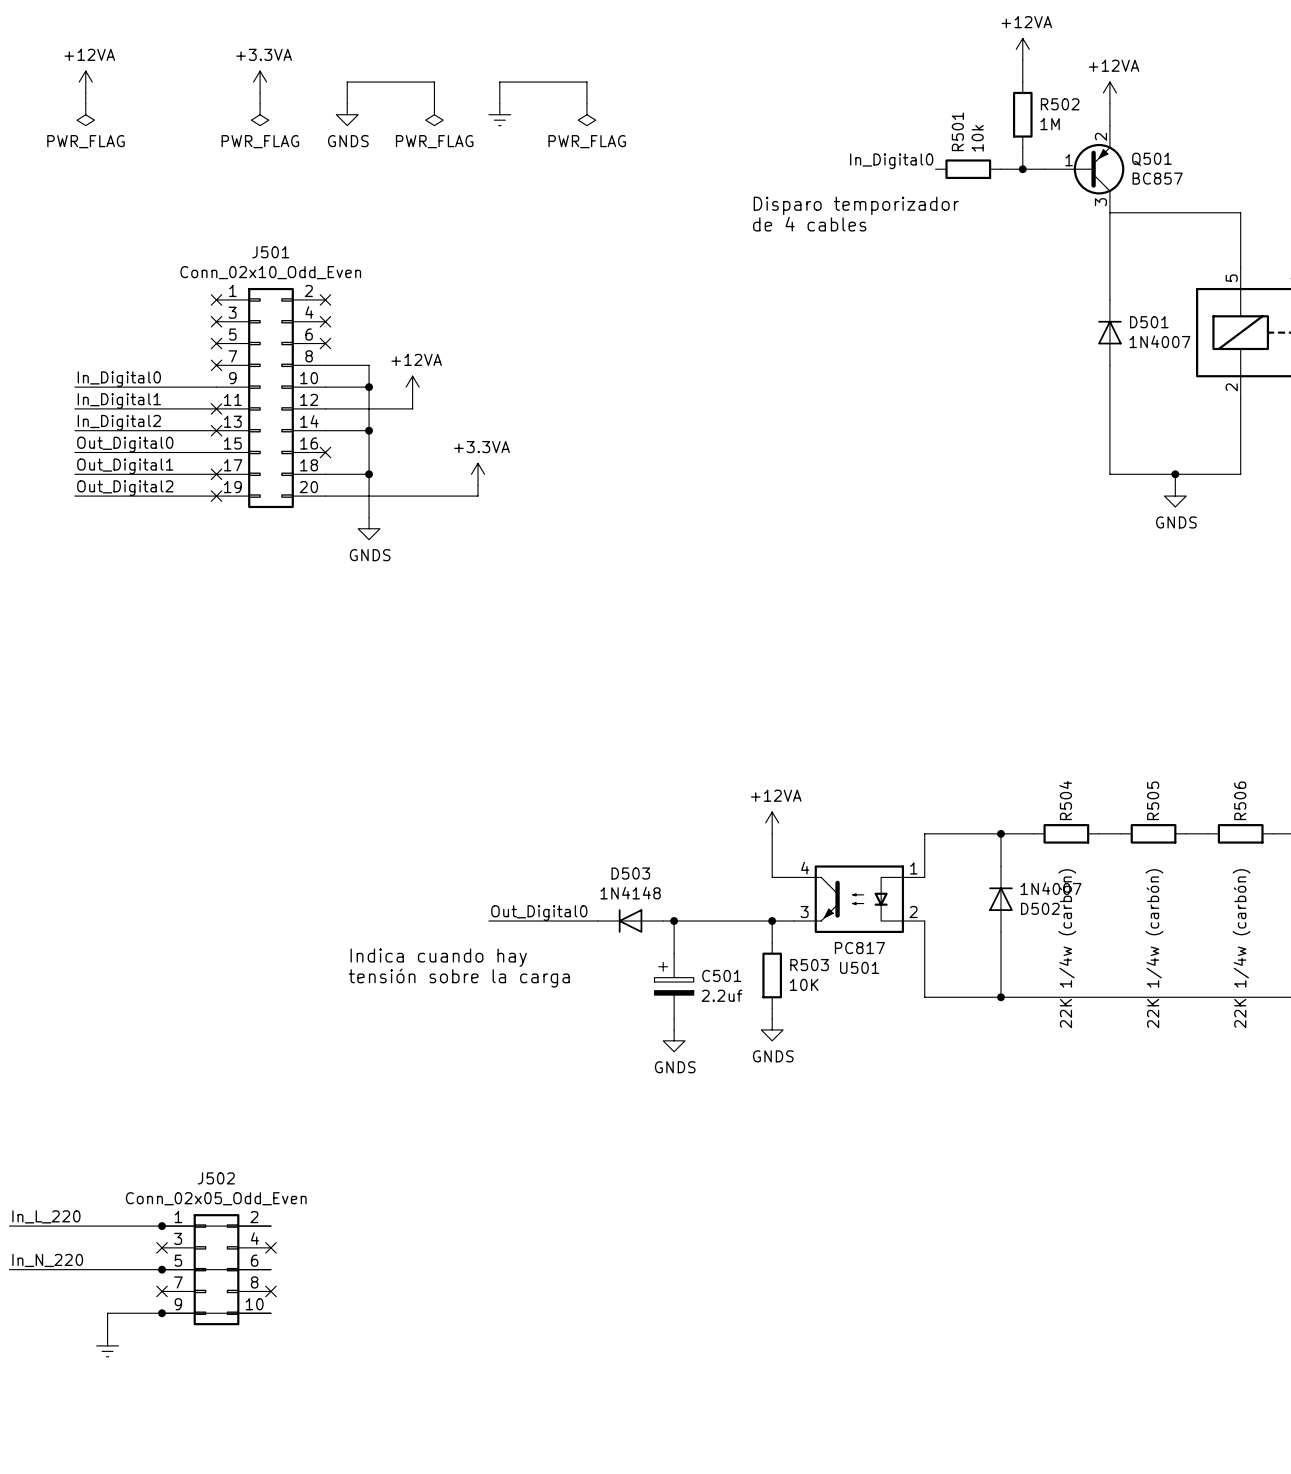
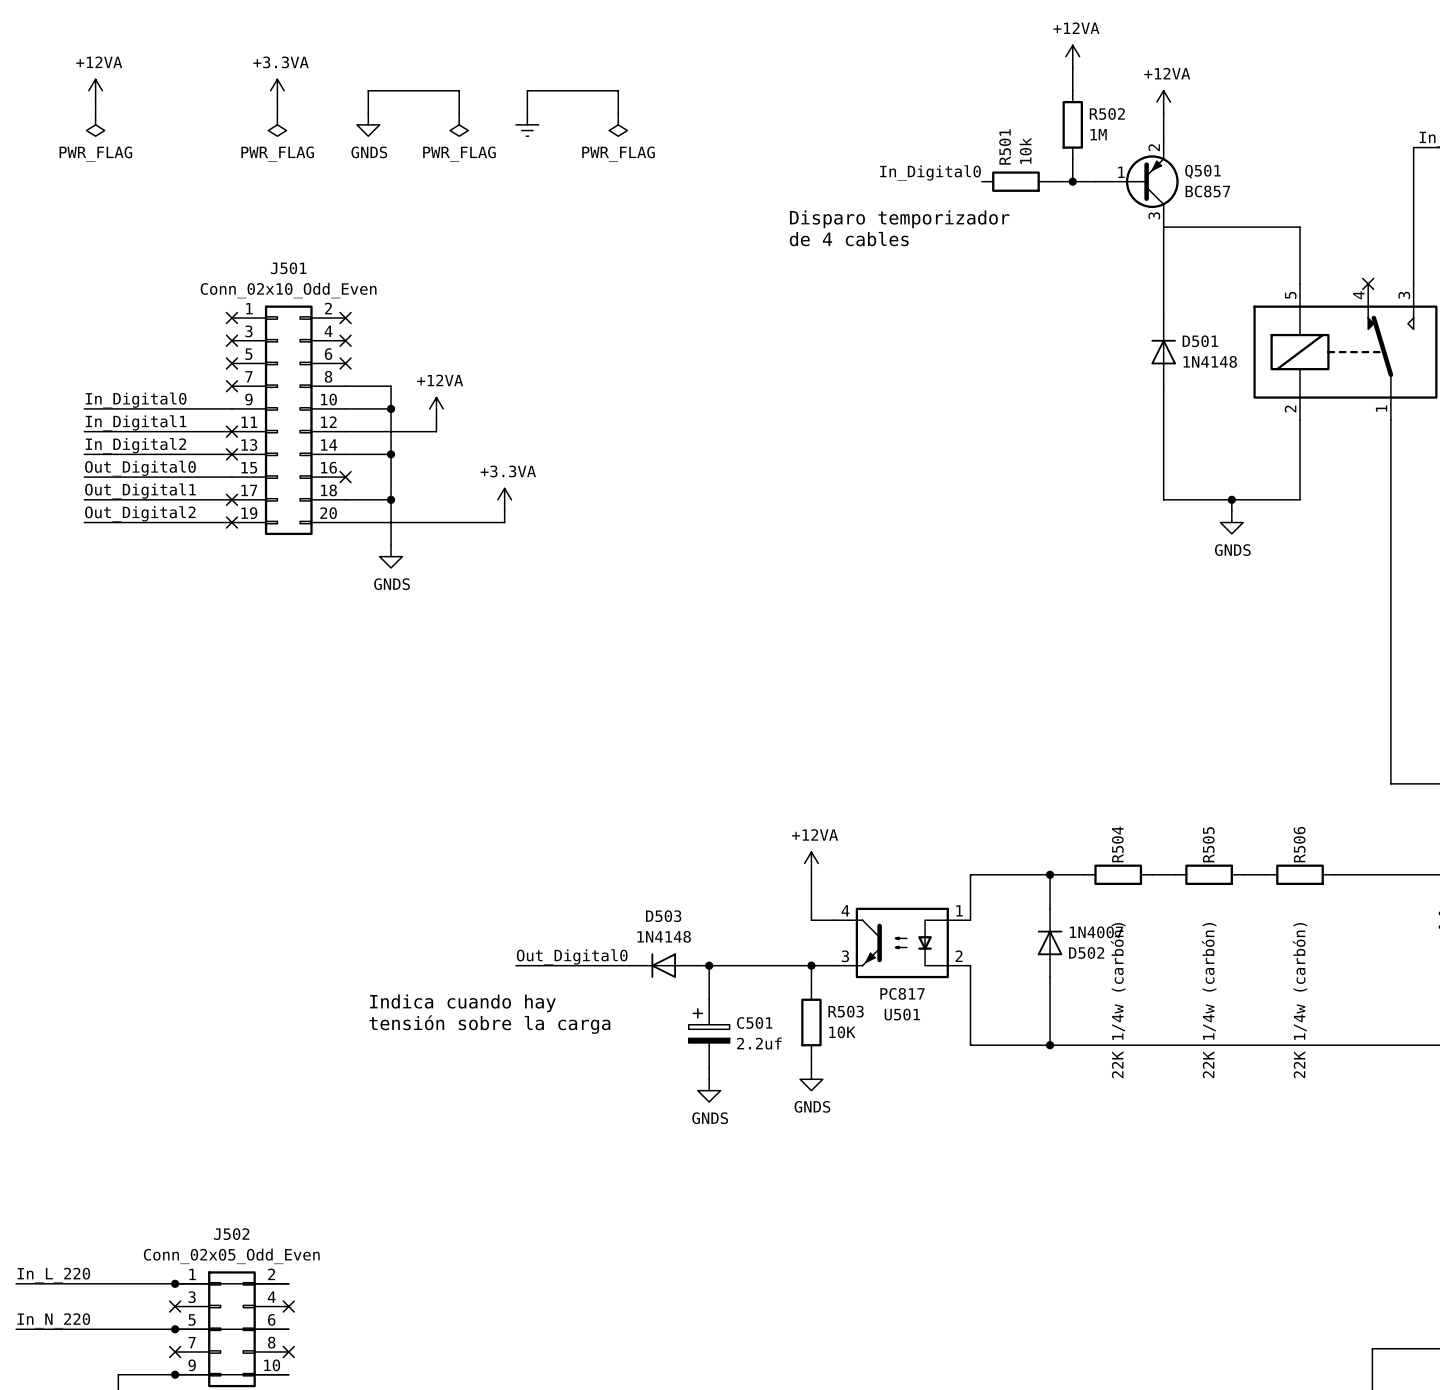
D501 value: 1N4007 (1159, 341) -> 1N4148 (1210, 361)

